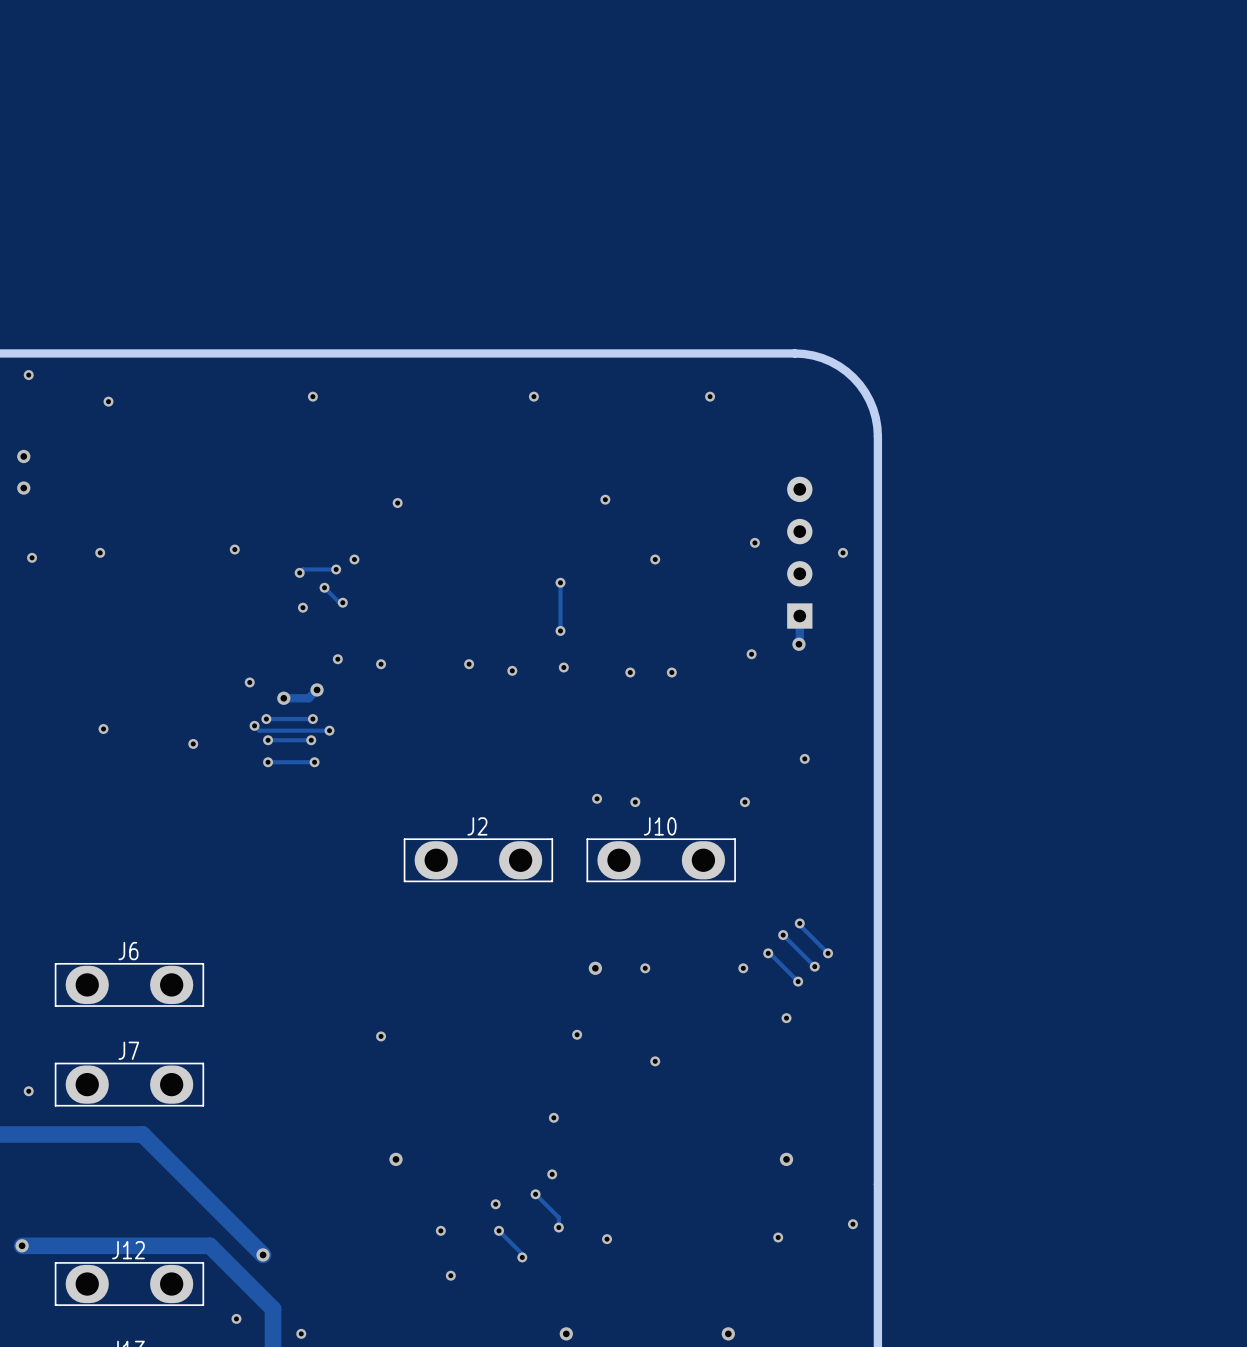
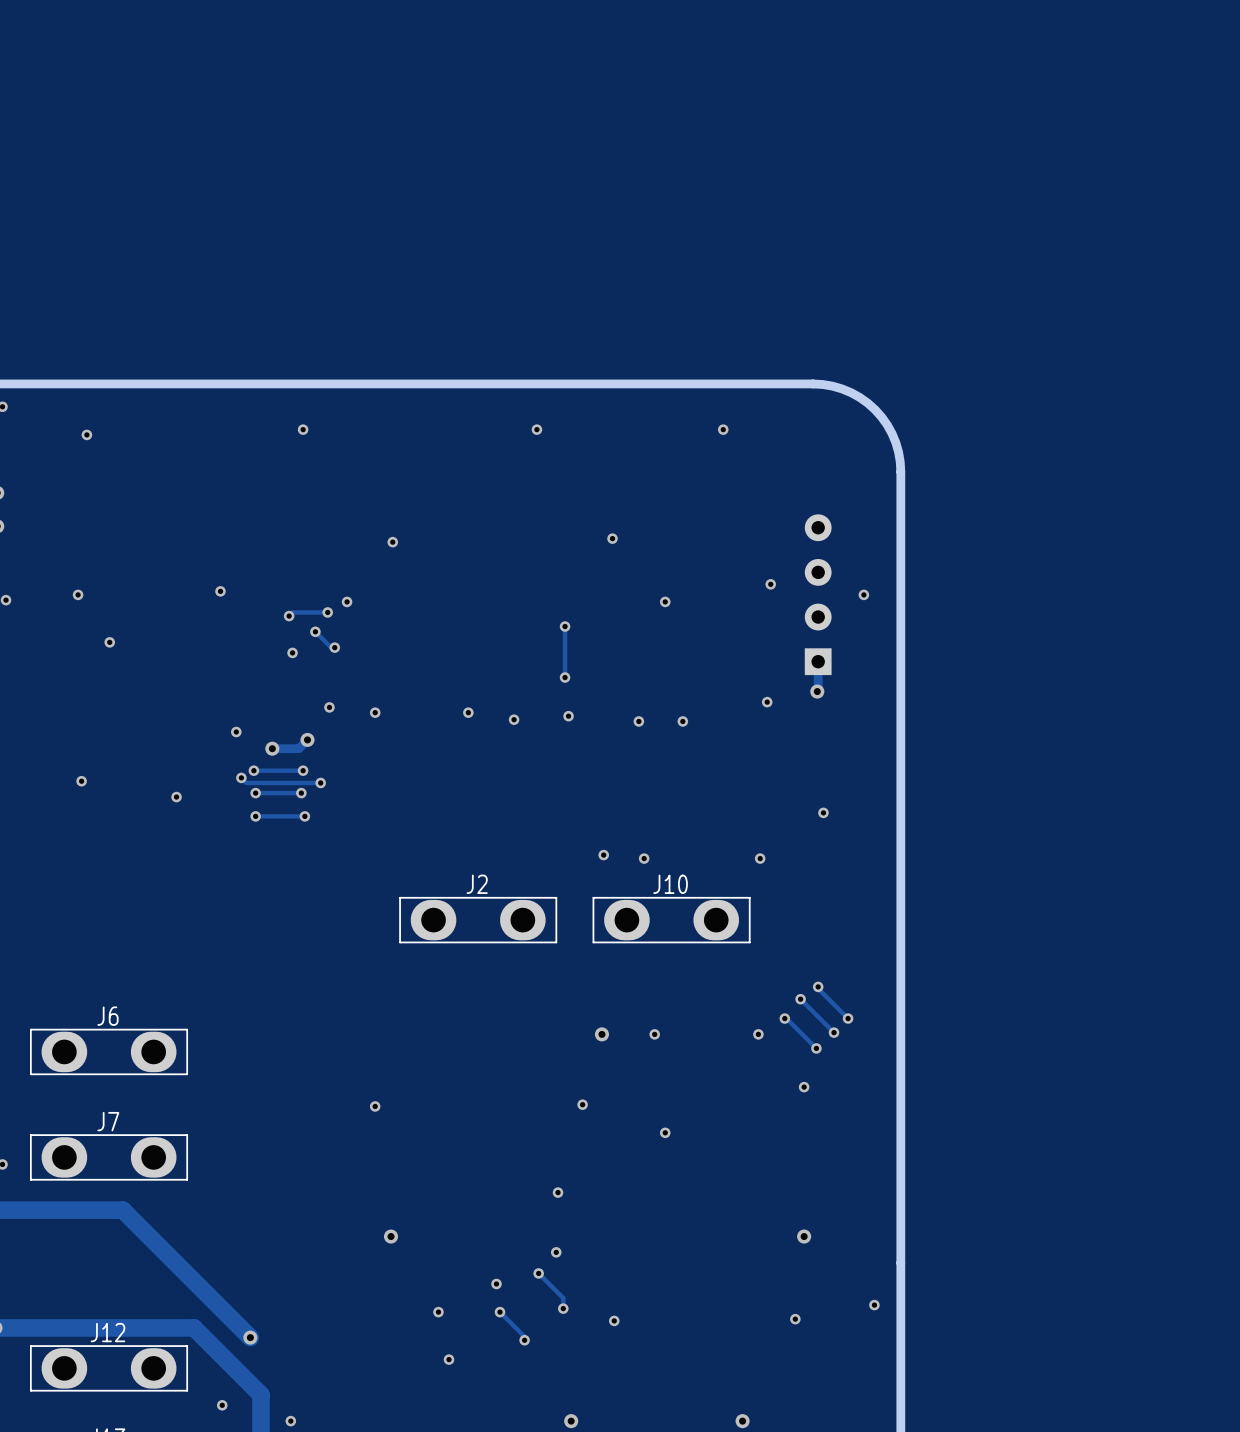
via: none -> (109, 642)

